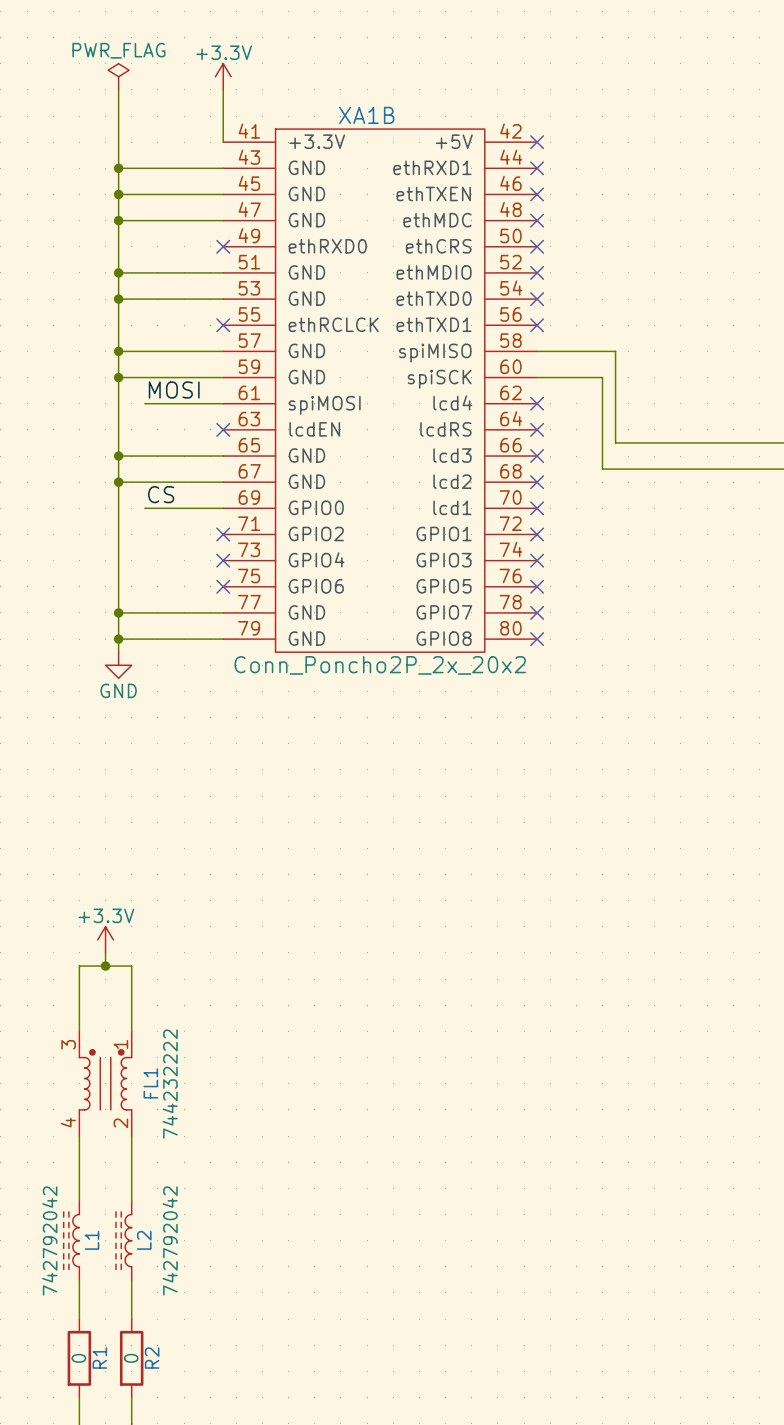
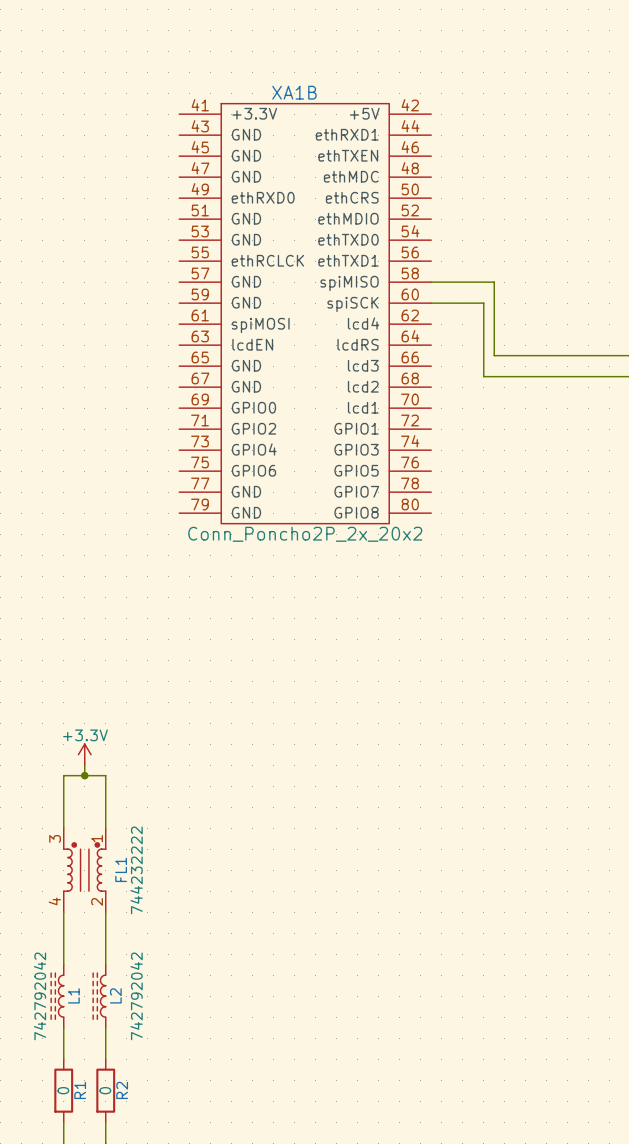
power symbol: PWR_FLAG (118, 76) -> none
power symbol: +3.3V (223, 76) -> none
wire: (118, 89) (118, 652) -> none
wire: (223, 89) (223, 142) -> none
no-connect mark: (537, 142) -> none
wire: (118, 168) (223, 168) -> none
junction: (118, 168) -> none
no-connect mark: (537, 168) -> none
wire: (118, 194) (223, 194) -> none
junction: (118, 194) -> none
no-connect mark: (537, 194) -> none
wire: (118, 220) (223, 220) -> none
junction: (118, 220) -> none
no-connect mark: (537, 220) -> none
no-connect mark: (223, 246) -> none
no-connect mark: (537, 246) -> none
wire: (118, 272) (223, 272) -> none
junction: (118, 272) -> none
no-connect mark: (537, 272) -> none
wire: (118, 299) (223, 299) -> none
junction: (118, 299) -> none
no-connect mark: (537, 299) -> none
no-connect mark: (223, 325) -> none
no-connect mark: (537, 325) -> none
wire: (118, 351) (223, 351) -> none
junction: (118, 351) -> none
wire: (118, 377) (223, 377) -> none
junction: (118, 377) -> none
label: MOSI (174, 390) -> none
wire: (144, 403) (223, 403) -> none
no-connect mark: (537, 403) -> none
no-connect mark: (223, 429) -> none
no-connect mark: (537, 429) -> none
wire: (118, 456) (223, 456) -> none
junction: (118, 456) -> none
no-connect mark: (537, 456) -> none
wire: (118, 482) (223, 482) -> none
junction: (118, 482) -> none
no-connect mark: (537, 482) -> none
label: CS (161, 494) -> none
wire: (144, 508) (223, 508) -> none
no-connect mark: (537, 508) -> none
no-connect mark: (223, 534) -> none
no-connect mark: (537, 534) -> none
no-connect mark: (223, 560) -> none
no-connect mark: (537, 560) -> none
no-connect mark: (223, 586) -> none
no-connect mark: (537, 586) -> none
wire: (118, 612) (223, 612) -> none
junction: (118, 612) -> none
no-connect mark: (537, 612) -> none
wire: (118, 639) (223, 639) -> none
junction: (118, 639) -> none
no-connect mark: (537, 639) -> none
power symbol: GND (118, 665) -> none

